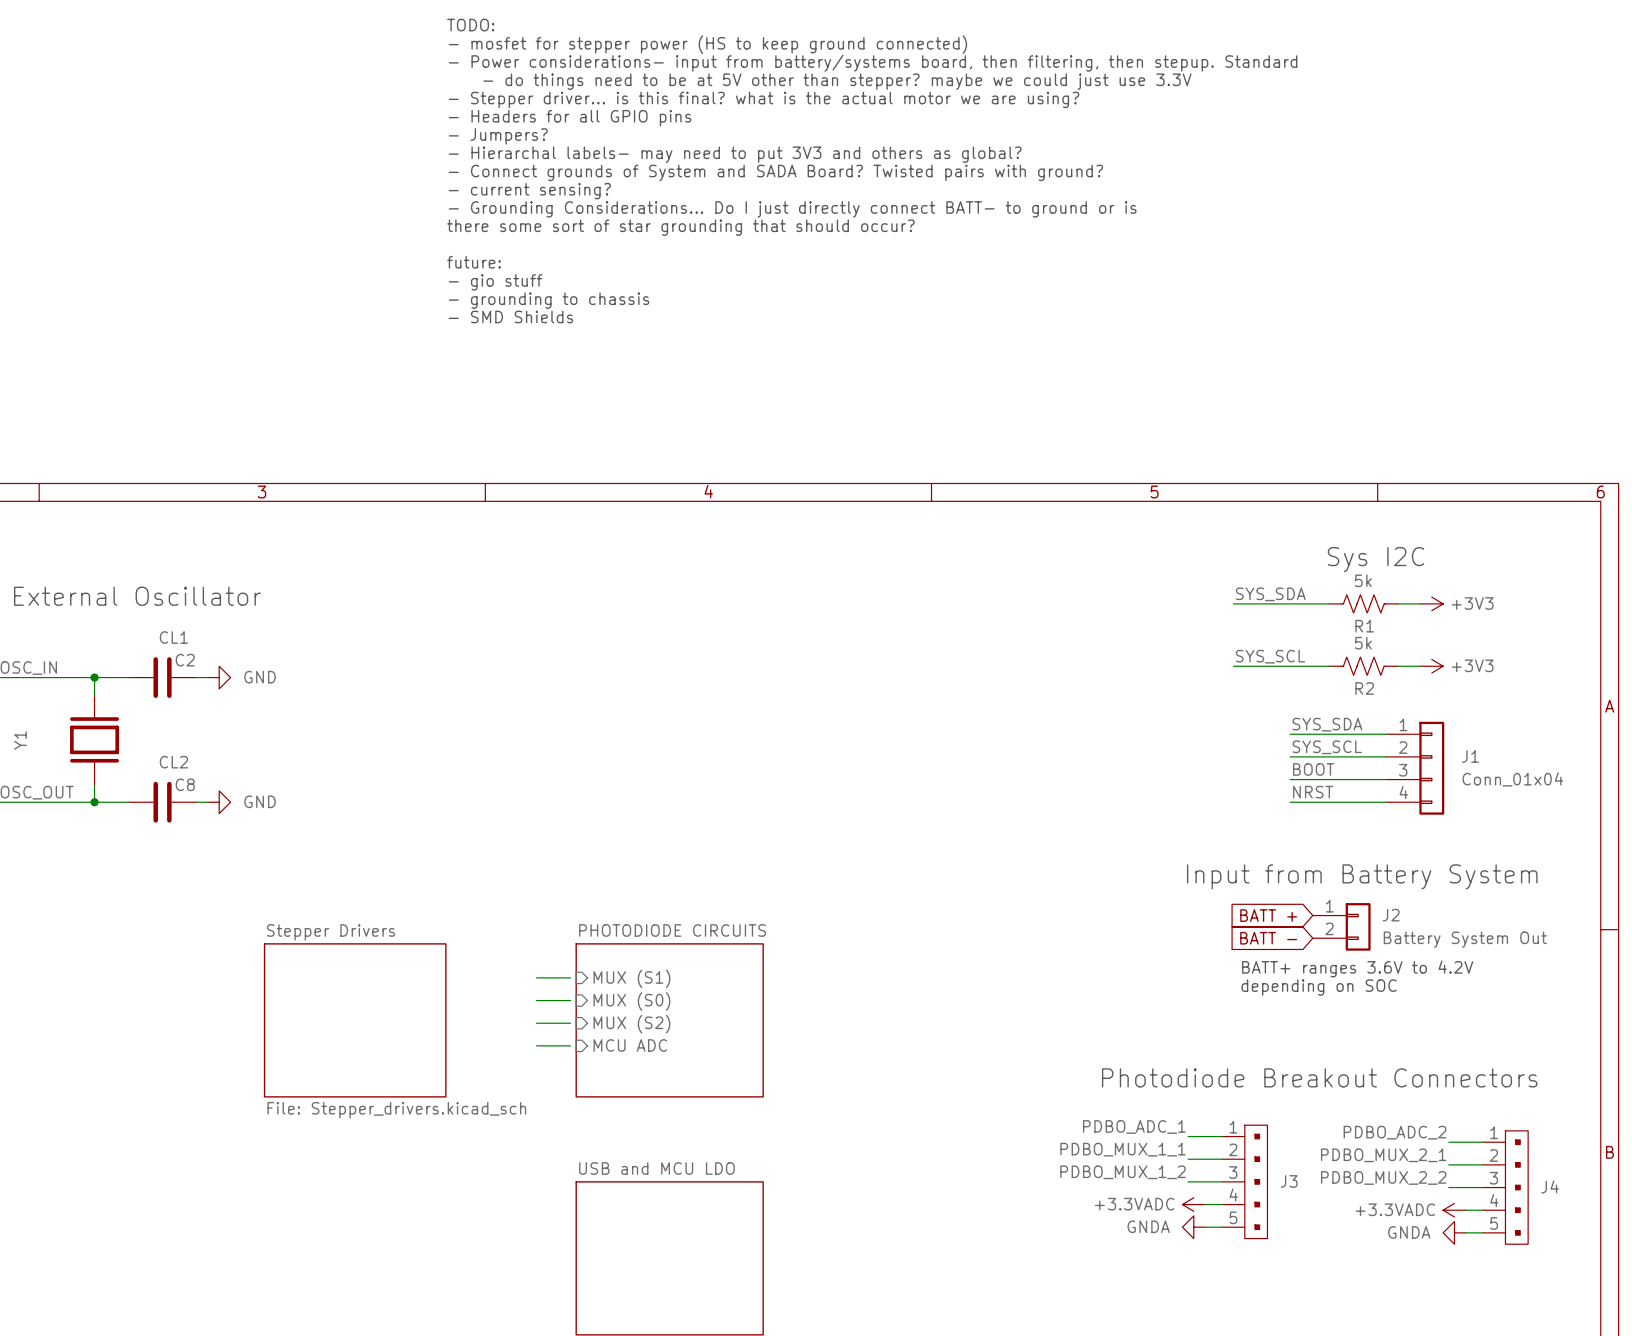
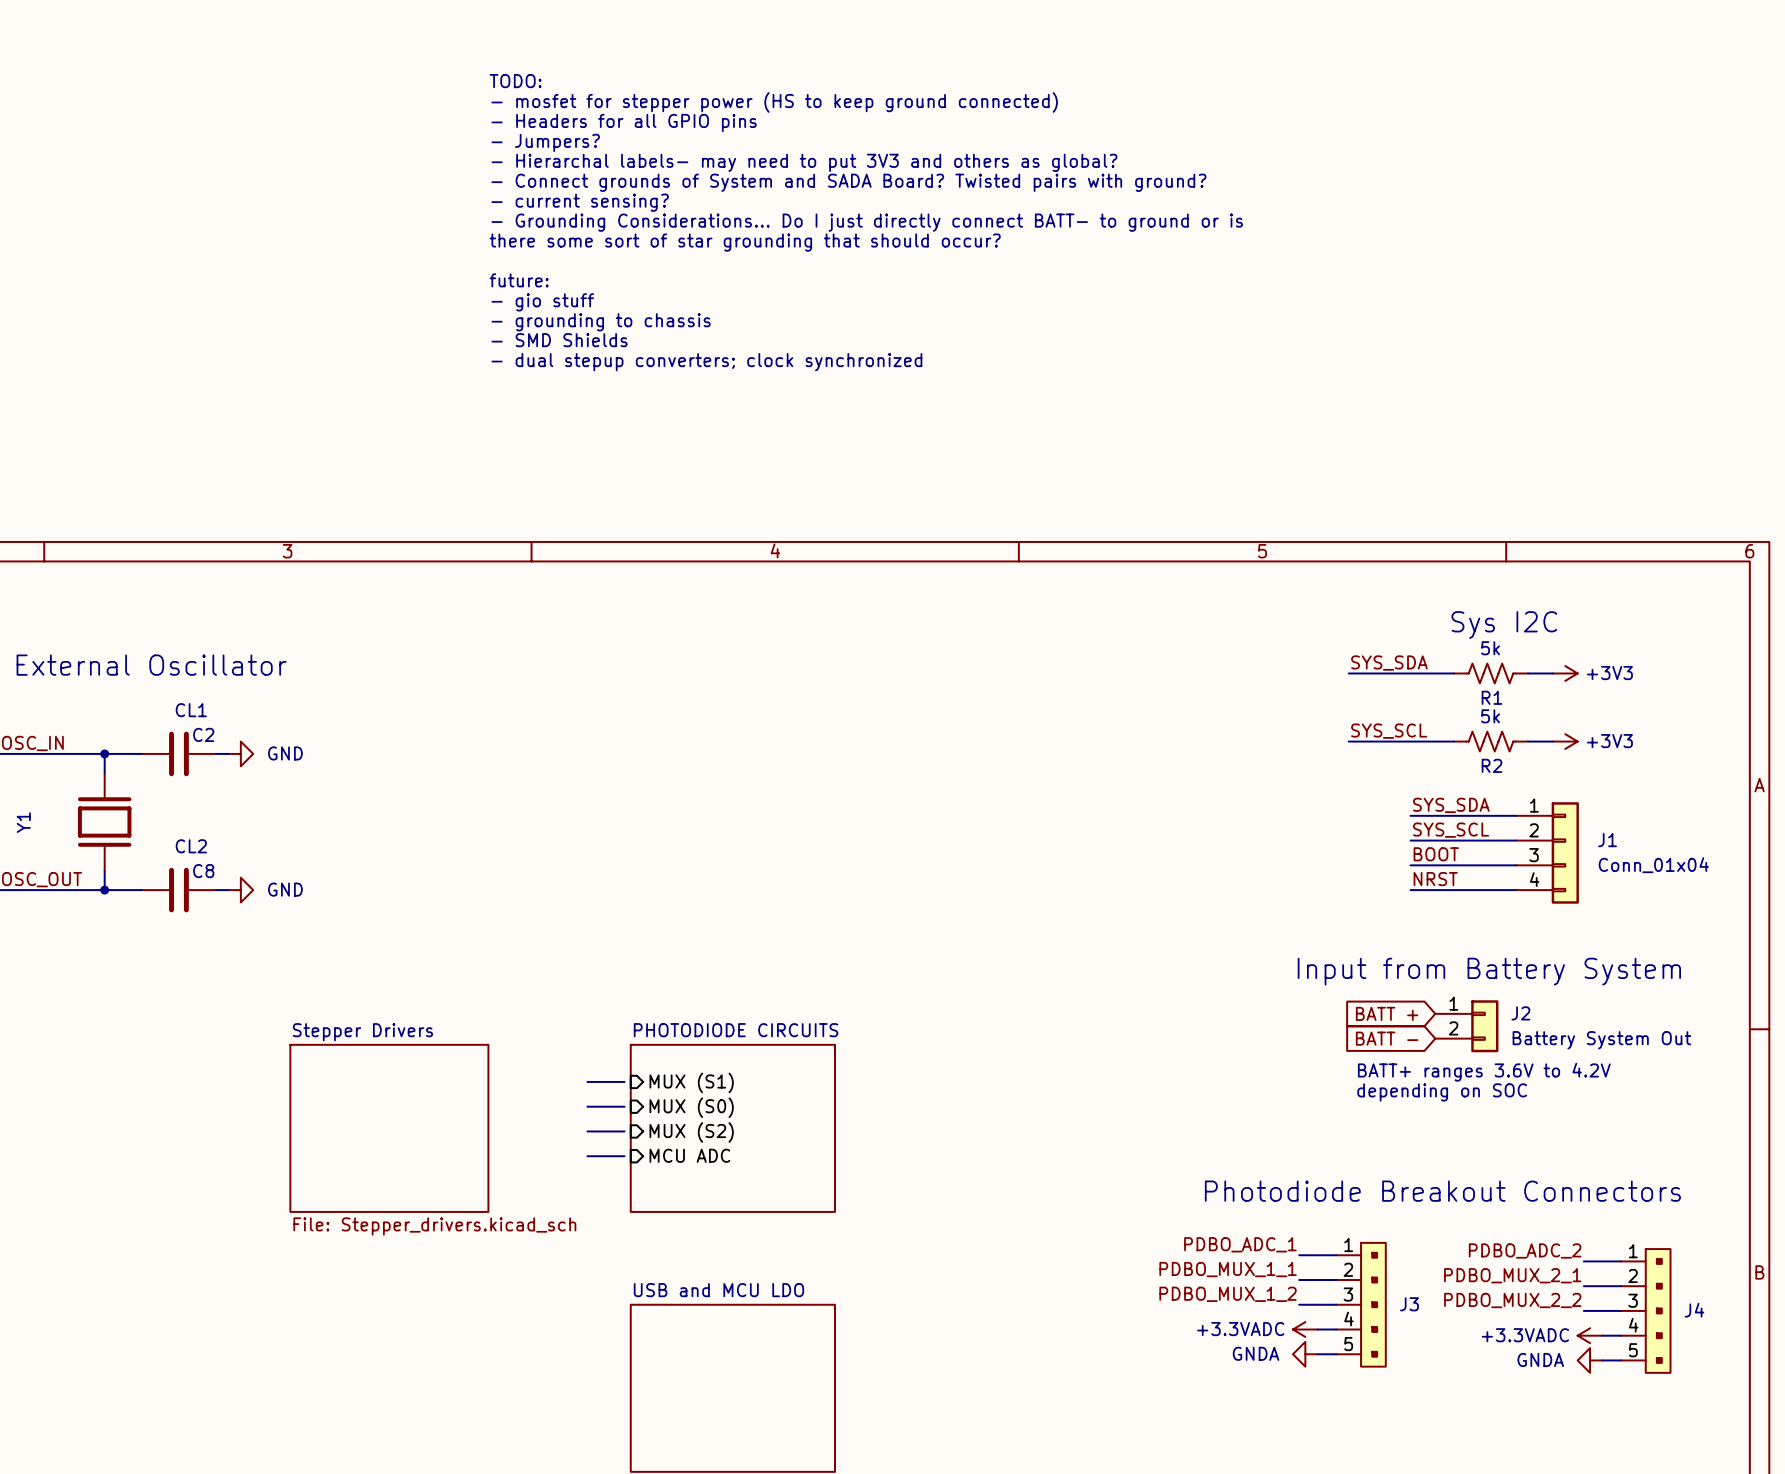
text: TODO: (470, 25) -> none
text: - mosfet for stepper power (HS to keep ground connected) (707, 44) -> none
text: - Power considerations- input from battery/systems board, then filtering, then stepup. Standard (873, 63) -> TODO: (515, 81)
text: - do things need to be at 5V other than stepper? maybe we could just use 3.3V (837, 81) -> - mosfet for stepper power (HS to keep ground connected) (774, 102)
text: - Stepper driver... is this final? what is the actual motor we are using? (764, 99) -> - Headers for all GPIO pins (624, 123)
text: - Headers for all GPIO pins (570, 118) -> - Jumpers? (545, 142)
text: - Jumpers? (498, 136) -> - Hierarchal labels- may need to put 3V3 and others as global? (804, 162)
text: - Hierarchal labels- may need to put 3V3 and others as global? (735, 154) -> - Connect grounds of System and SADA Board? Twisted pairs with ground? (848, 182)
text: - Connect grounds of System and SADA Board? Twisted pairs with ground? (775, 172) -> - current sensing? (580, 202)
text: - current sensing? (529, 191) -> - Grounding Considerations... Do I just directly connect BATT- to ground or is (867, 222)
text: - Grounding Considerations... Do I just directly connect BATT- to ground or is (792, 209) -> there some sort of star grounding that should occur? (745, 242)
text: there some sort of star grounding that should occur? (680, 227) -> none
text: none -> future: (519, 280)
text: future: (474, 262) -> - gio stuff (542, 302)
text: - gio stuff (495, 282) -> - grounding to chassis (601, 322)
text: - grounding to chassis (549, 300) -> - SMD Shields (559, 340)
text: - SMD Shields (510, 316) -> - dual stepup converters; clock synchronized (706, 362)

